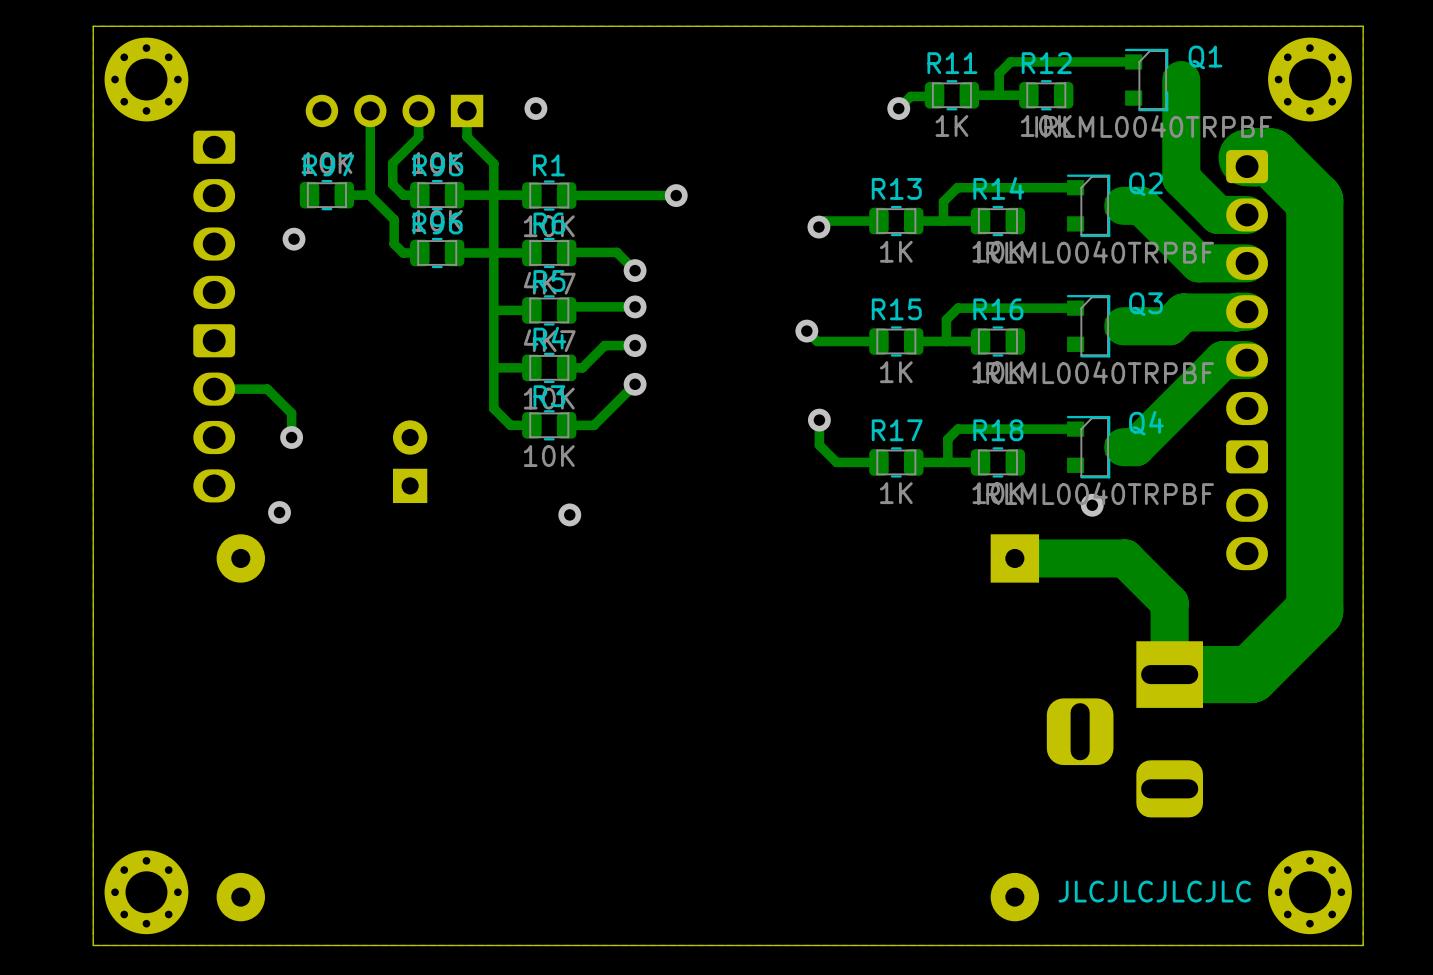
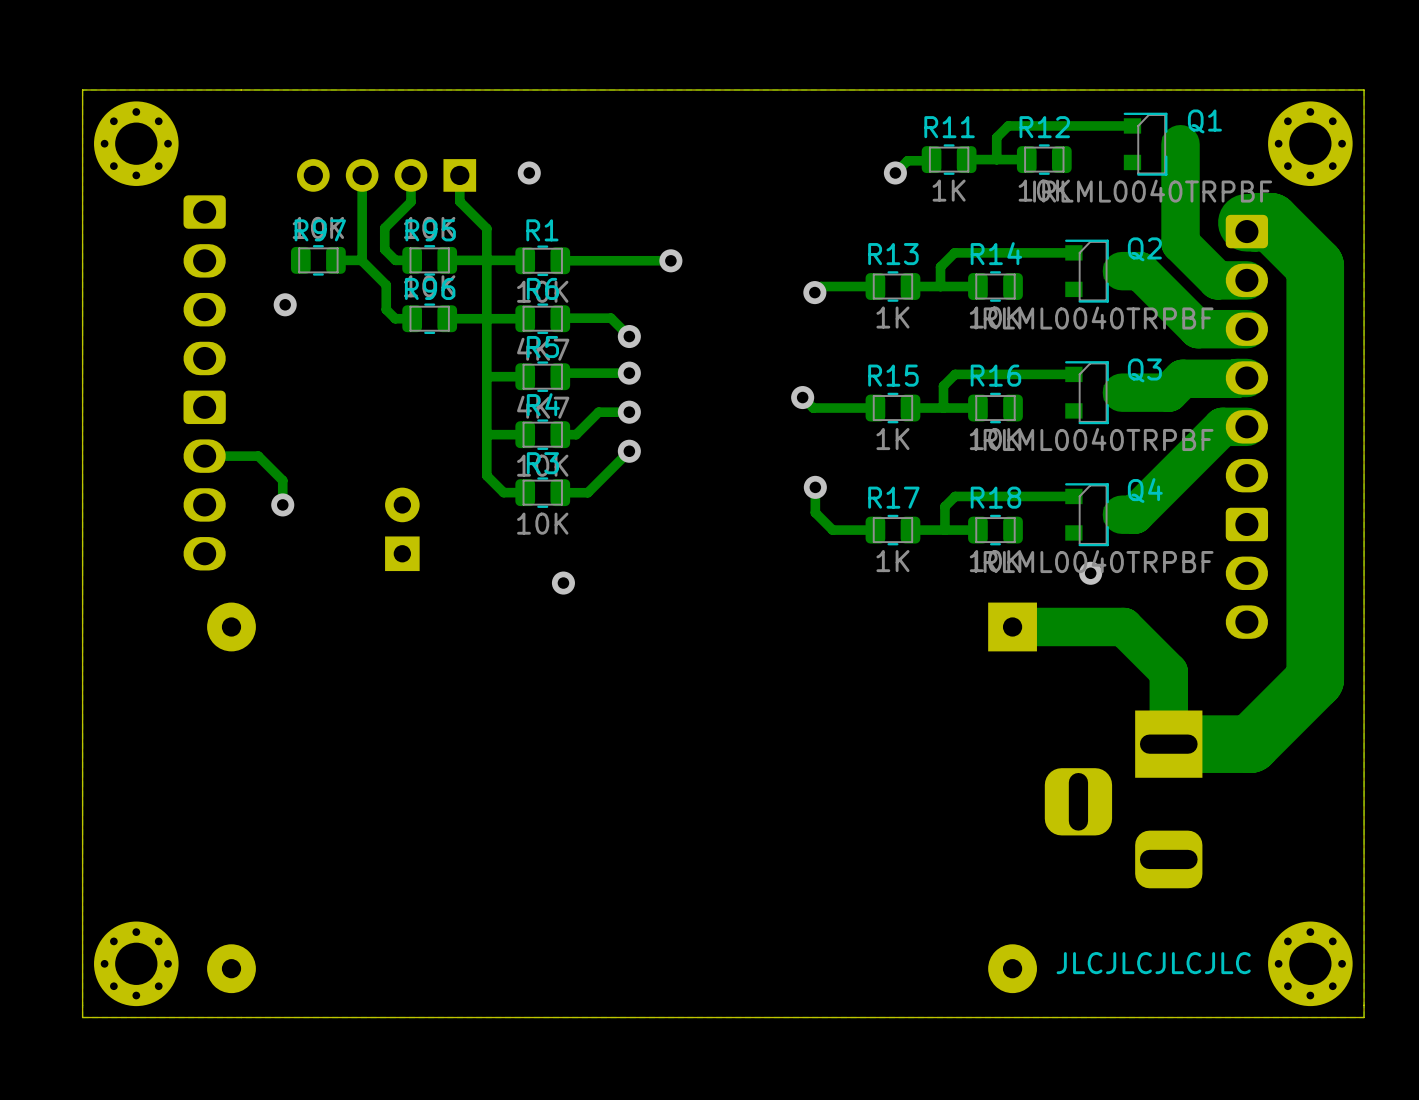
via: (279, 512) -> none

